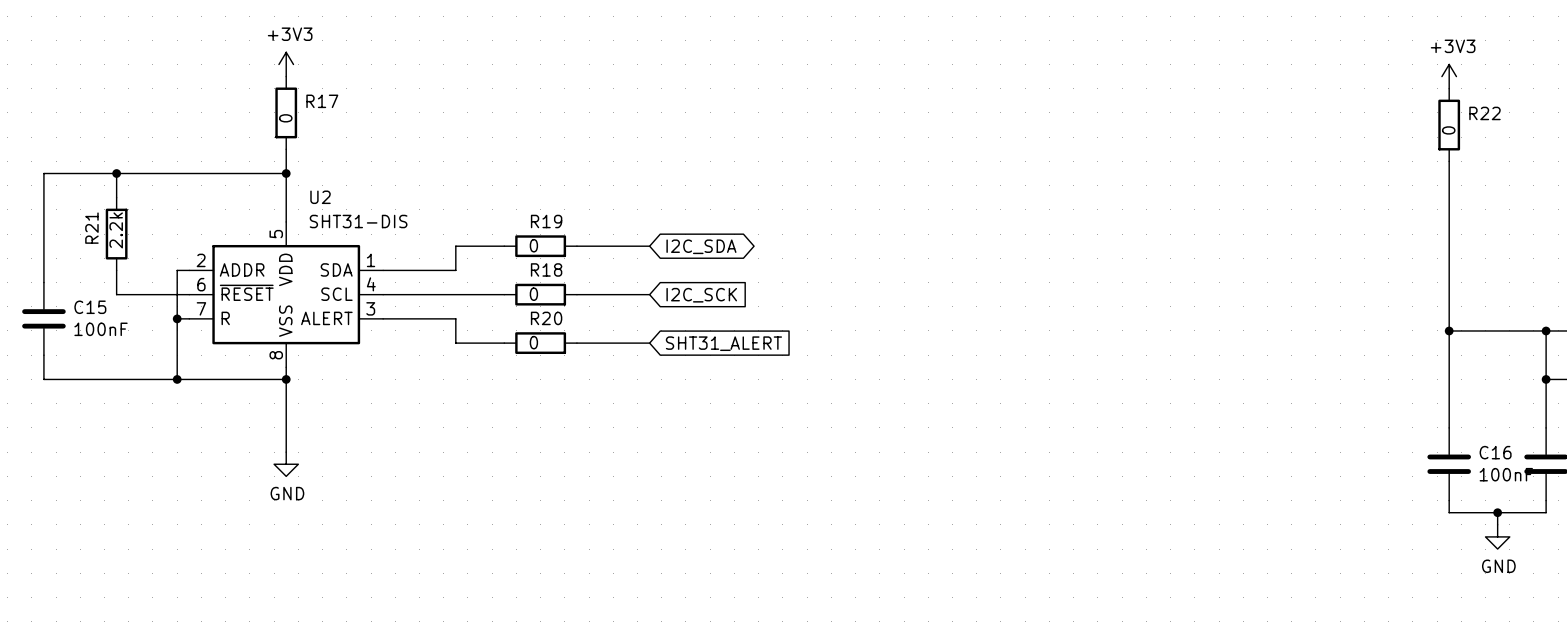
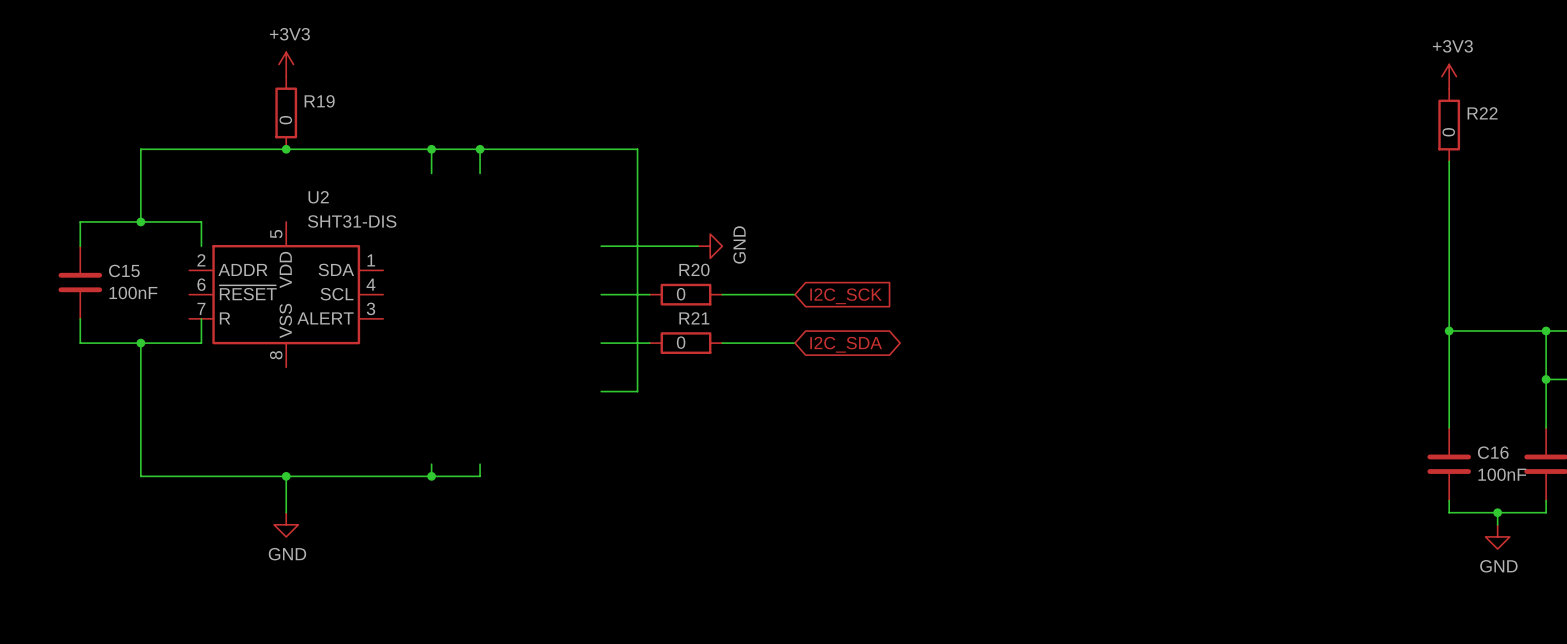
R17 name: R17 (322, 101) -> R19 (319, 101)
wire: (286, 149) (286, 221) -> none
wire: none -> (431, 149) (431, 173)
junction: none -> (431, 149)
wire: none -> (480, 149) (480, 173)
junction: none -> (480, 149)
wire: (116, 173) (116, 197) -> none
junction: (116, 173) -> none
wire: (286, 173) (43, 173) (43, 282) -> none
junction position: (286, 173) -> (286, 149)
wire: none -> (140, 221) (140, 149) (637, 149) (637, 391) (601, 391)
junction: none -> (140, 221)
R21 value: 2.2k (116, 230) -> 0 (681, 342)
R21 rotation: 0° (116, 234) -> 90° clockwise (685, 343)
R21 position: (116, 234) -> (685, 343)
wire: none -> (80, 246) (80, 221) (201, 221) (201, 246)
wire: (504, 246) (455, 246) (455, 270) (383, 270) -> none
R19: 0 (540, 246) -> none
wire: (576, 246) (601, 246) -> none
wire: none -> (649, 246) (698, 246)
global label position: I2C_SDA (701, 246) -> I2C_SDA (846, 344)
power symbol: none -> GND (710, 246)
wire: (116, 270) (116, 294) (189, 294) -> none
wire: (189, 270) (177, 270) (177, 379) -> none
wire: (383, 294) (504, 294) -> none
R18: 0 (540, 294) -> none
wire: (576, 294) (601, 294) -> none
wire: none -> (722, 294) (795, 294)
global label position: I2C_SCK (701, 295) -> I2C_SCK (846, 296)
C15 position: (43, 318) -> (80, 282)
wire: none -> (80, 318) (80, 343) (201, 343) (201, 318)
wire: (177, 318) (189, 318) -> none
junction: (177, 318) -> none
wire: (383, 318) (455, 318) (455, 343) (504, 343) -> none
wire: none -> (140, 343) (140, 476) (480, 476) (480, 464)
junction: none -> (140, 343)
R20 position: (540, 343) -> (685, 294)
wire: (576, 343) (601, 343) -> none
wire: none -> (722, 343) (795, 343)
global label: SHT31_ALERT (723, 343) -> none
wire: (43, 355) (43, 379) (286, 379) -> none
wire: (286, 367) (286, 452) -> none
junction: (177, 379) -> none
junction: (286, 379) -> none
power symbol position: GND (286, 464) -> GND (286, 524)
wire: none -> (431, 464) (431, 476)
wire: none -> (286, 476) (286, 512)
junction: none -> (286, 476)
junction: none -> (431, 476)

